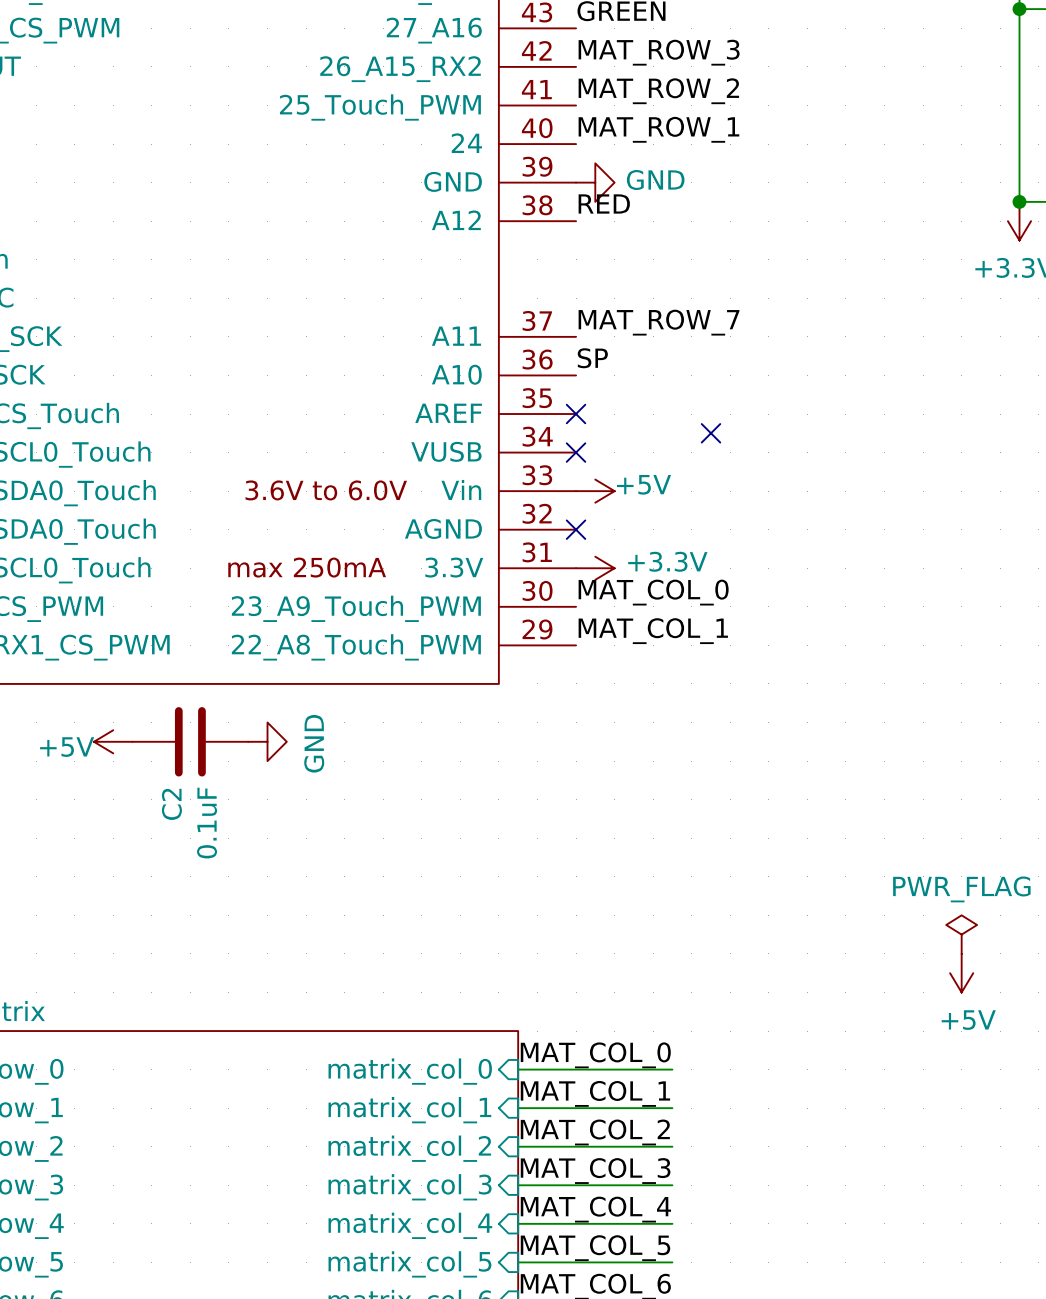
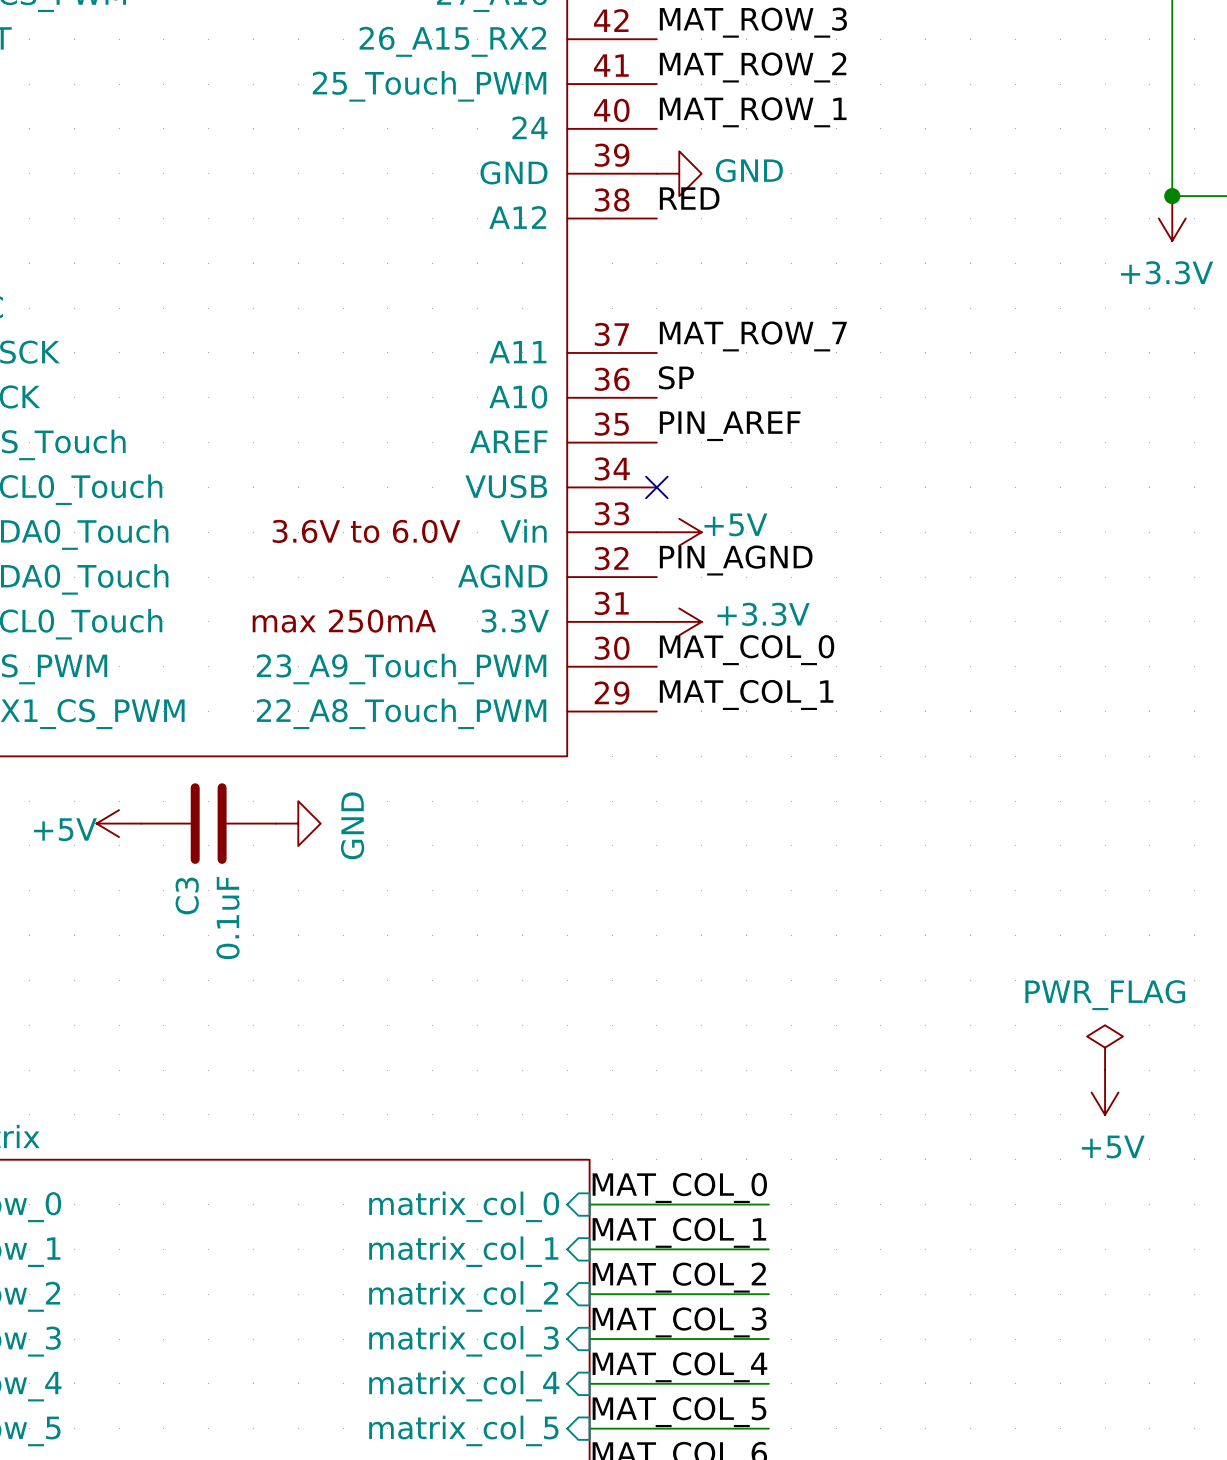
label: none -> PIN_AREF (730, 426)
no-connect mark: (576, 414) -> none
no-connect mark: (710, 433) -> none
label: none -> PIN_AGND (736, 560)
no-connect mark: (576, 529) -> none
C2 name: C2 (171, 804) -> C3 (187, 896)

